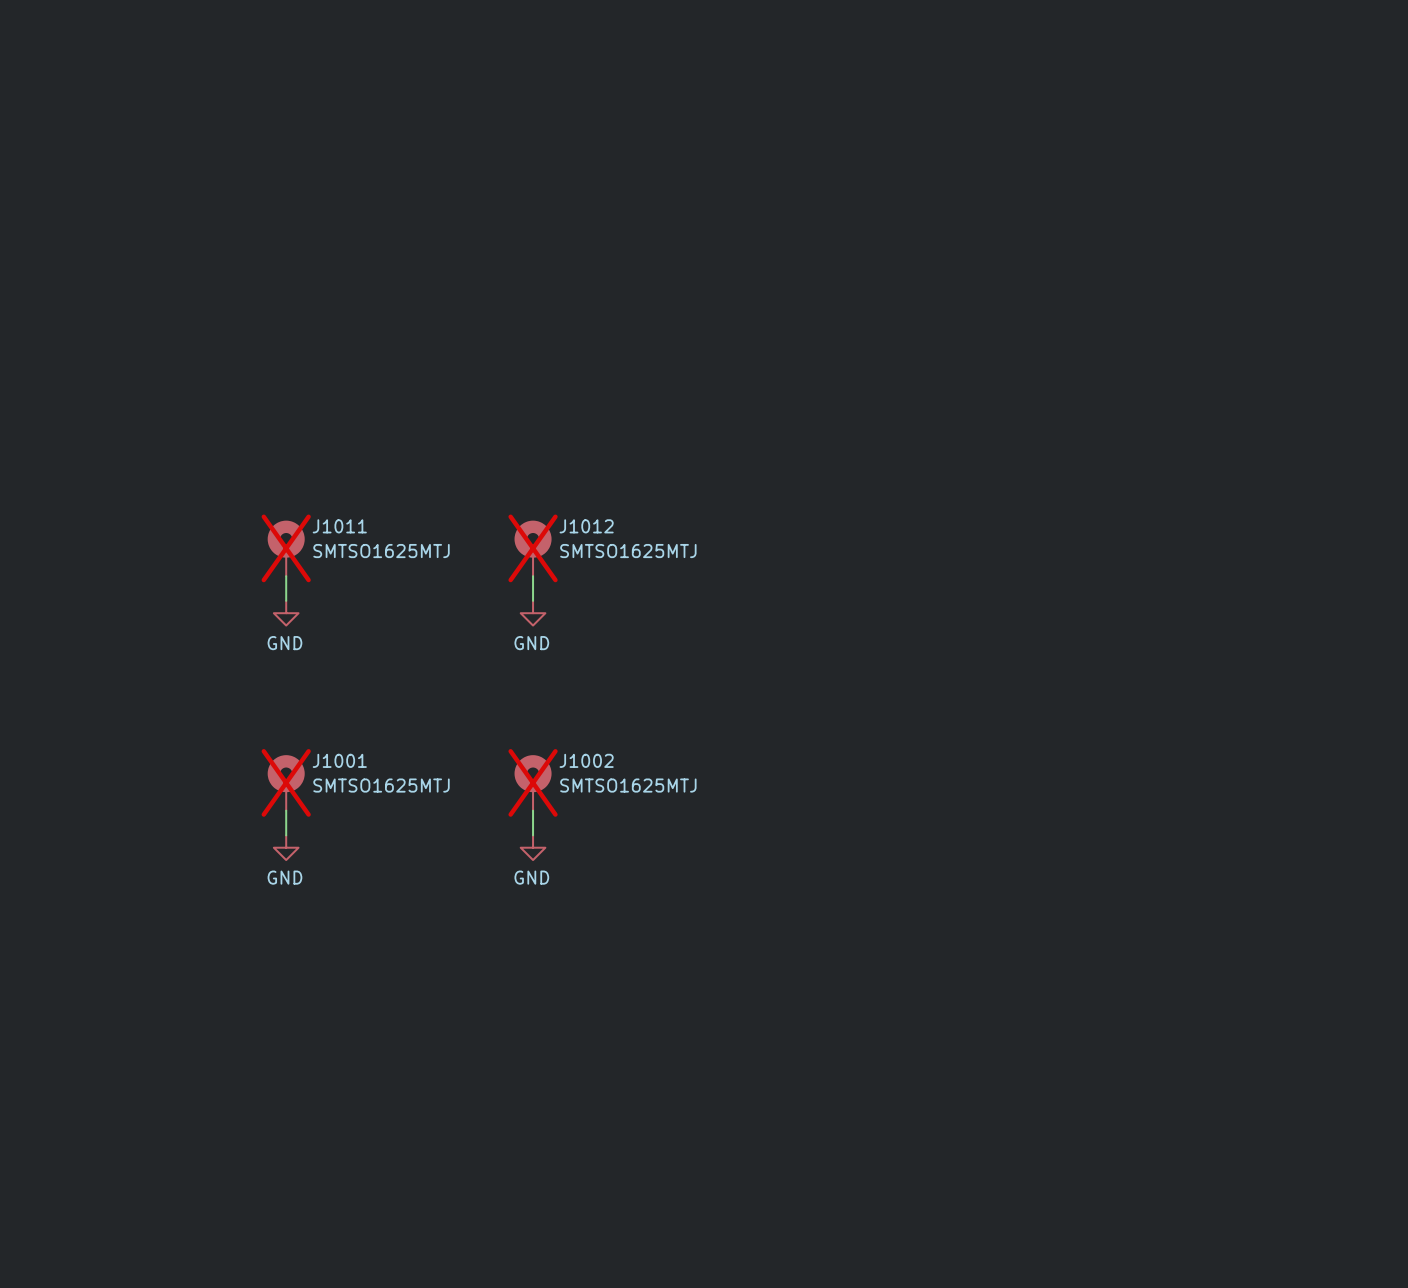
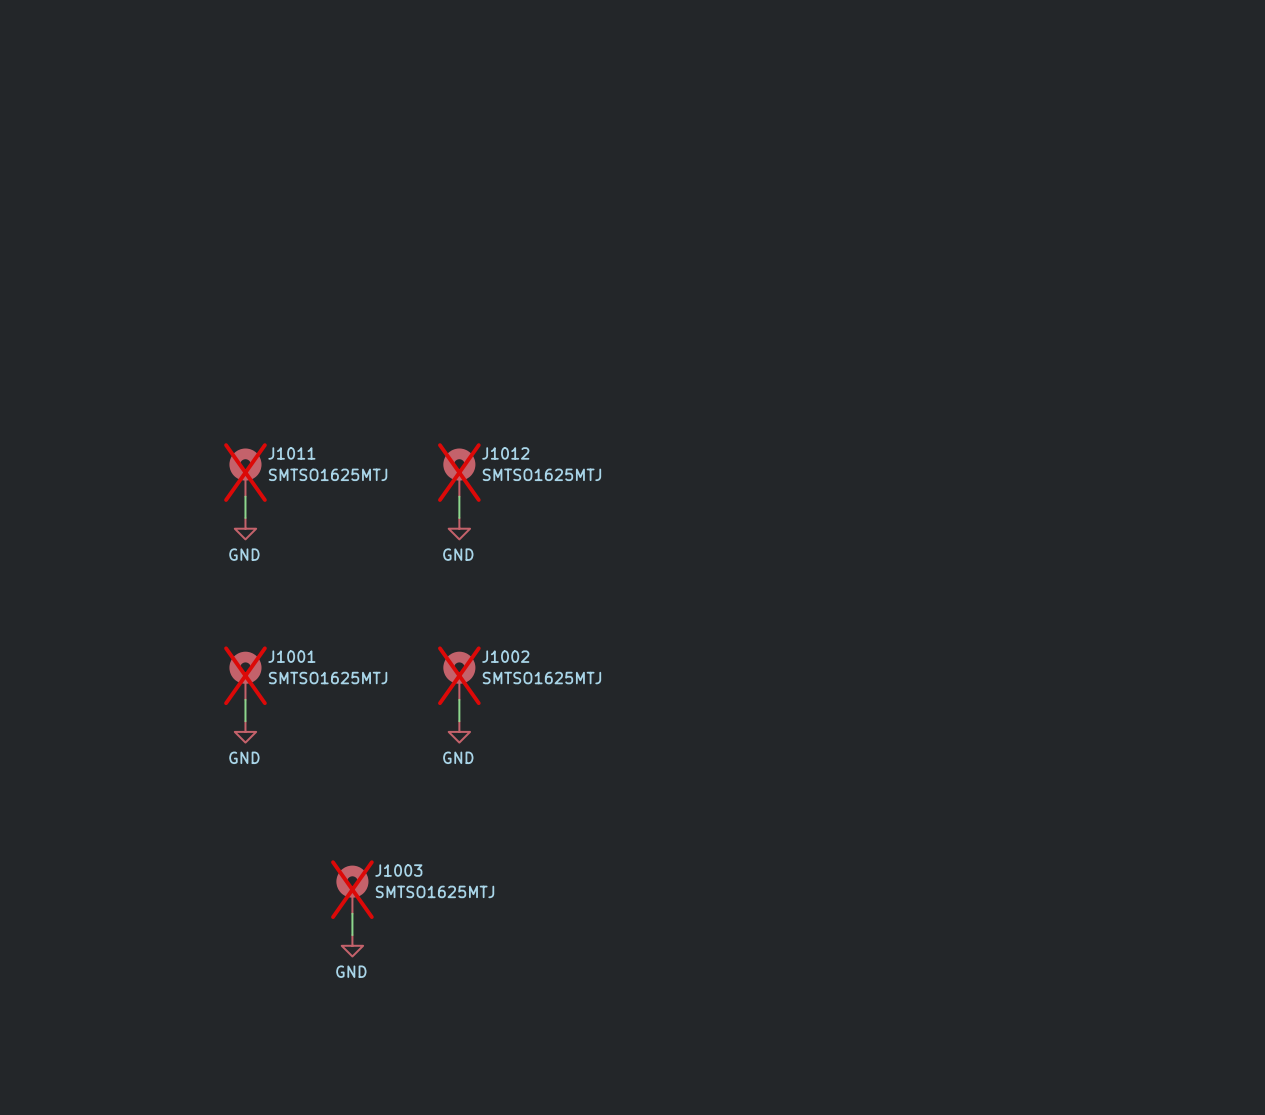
J1003: none -> SMTSO1625MTJ (352, 889)
wire: none -> (352, 913) (352, 935)
power symbol: none -> GND (352, 945)

